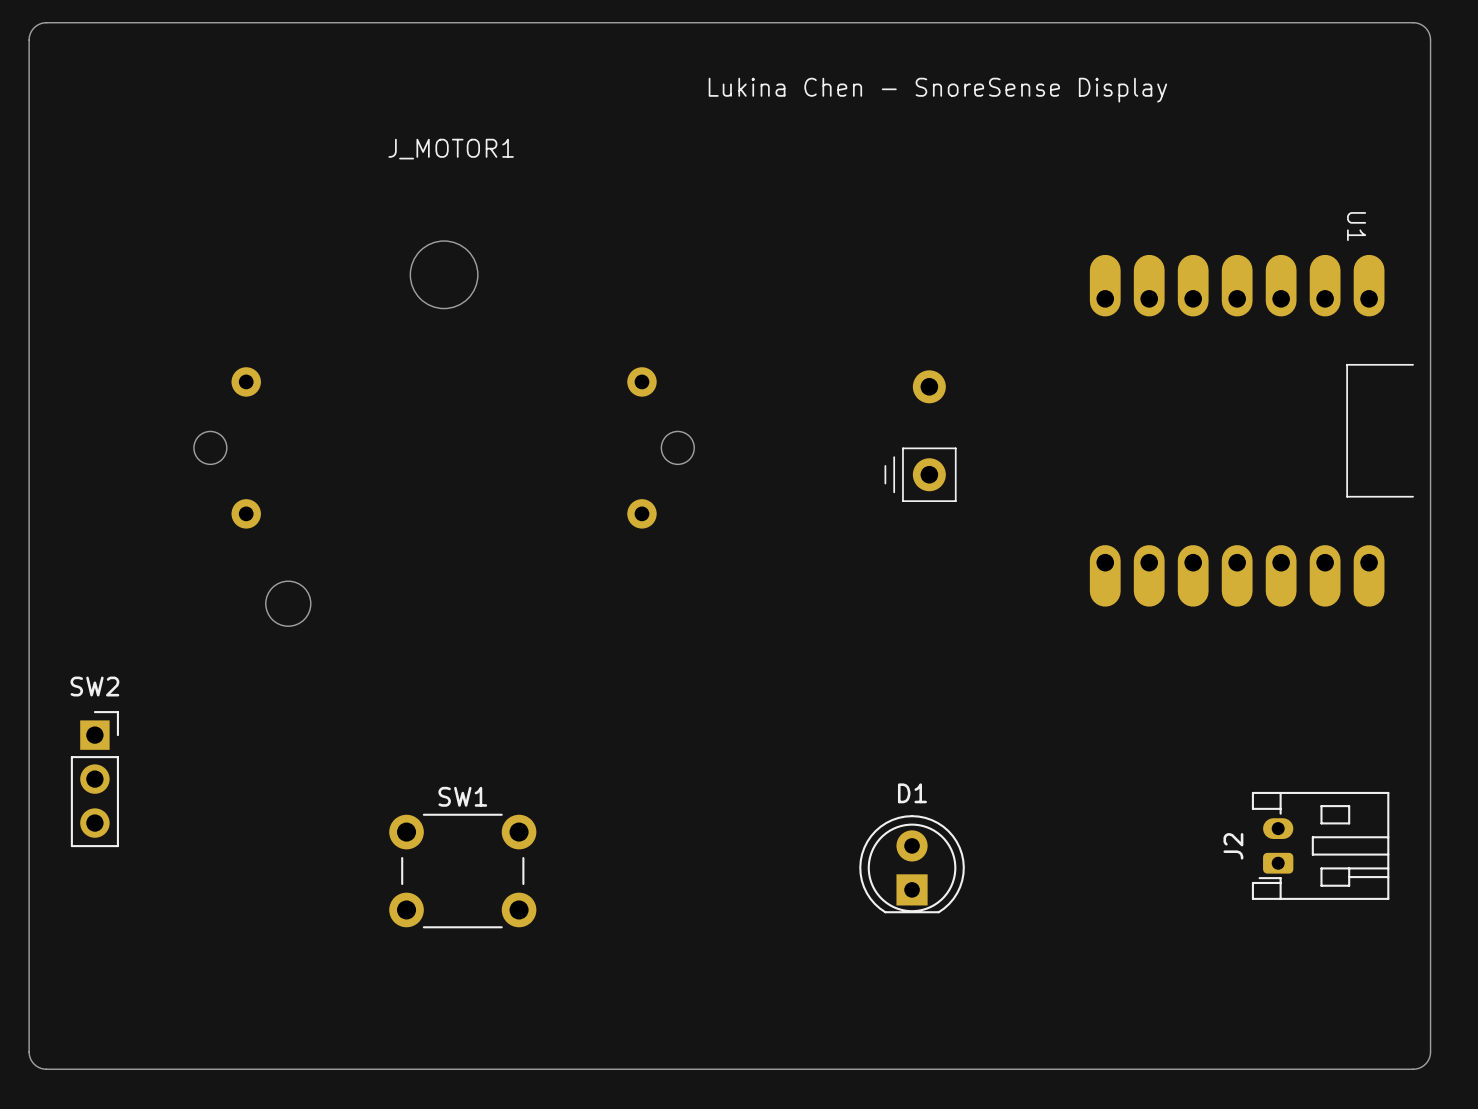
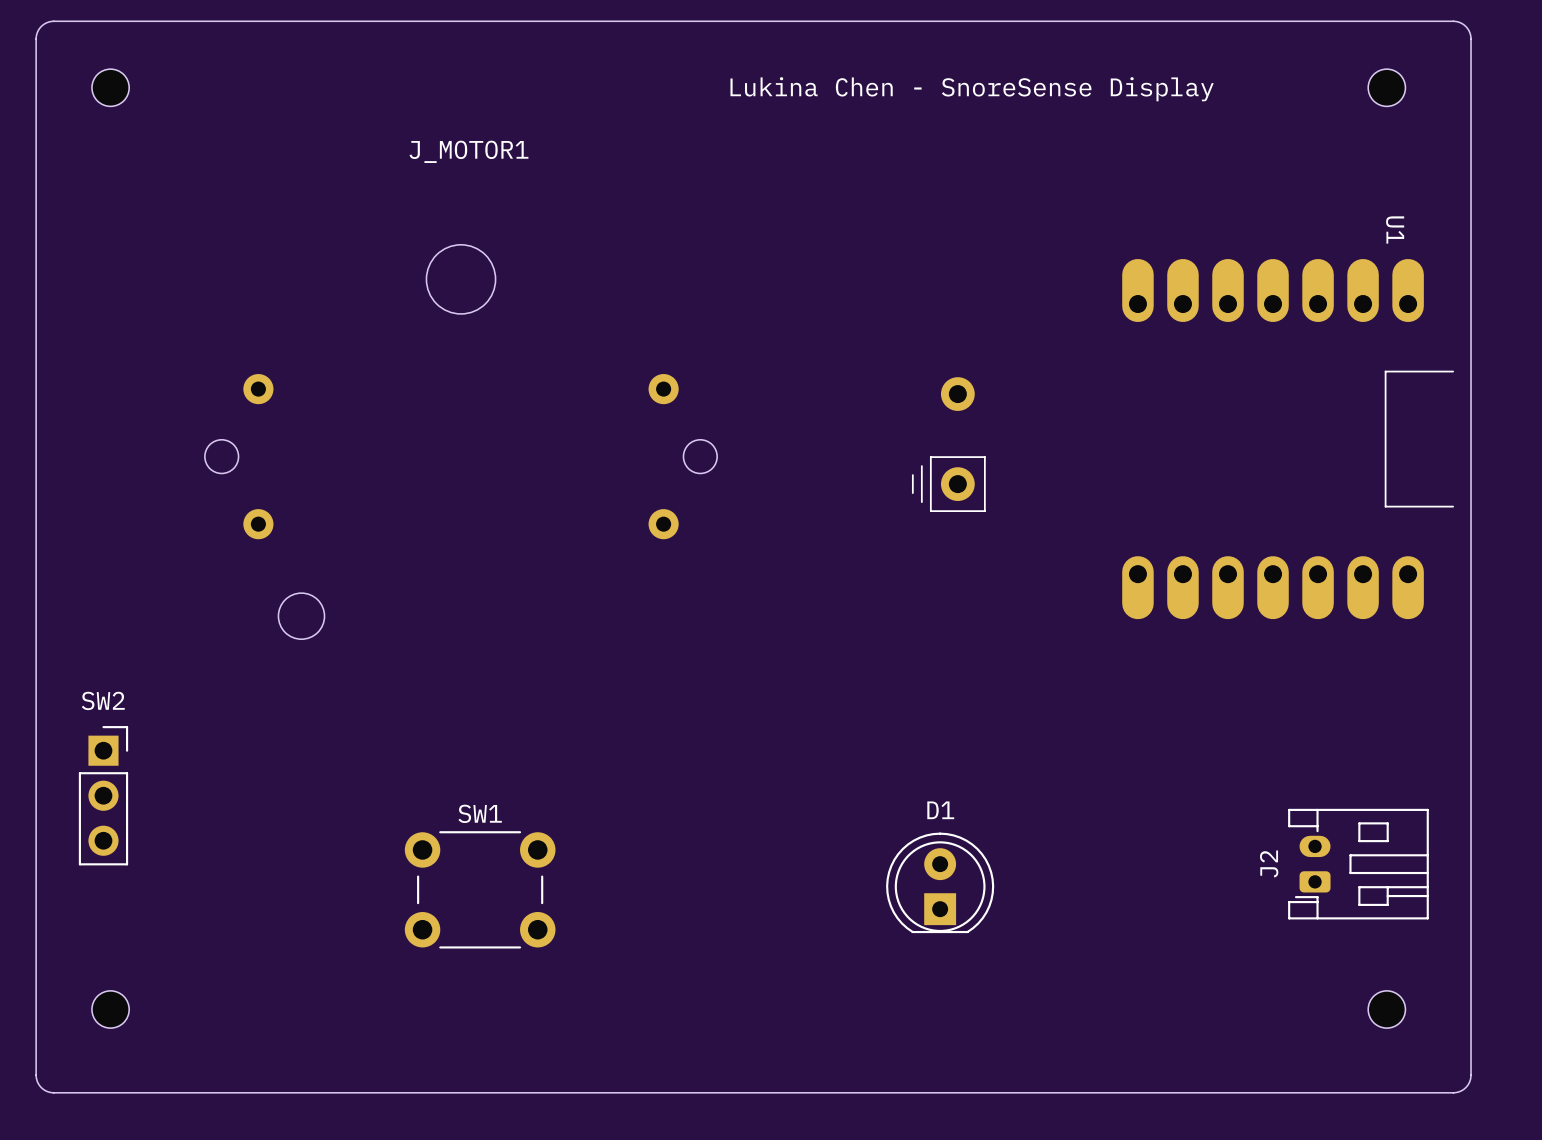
part: none -> (110, 87)
part: none -> (1386, 87)
part: none -> (110, 1009)
part: none -> (1386, 1009)

